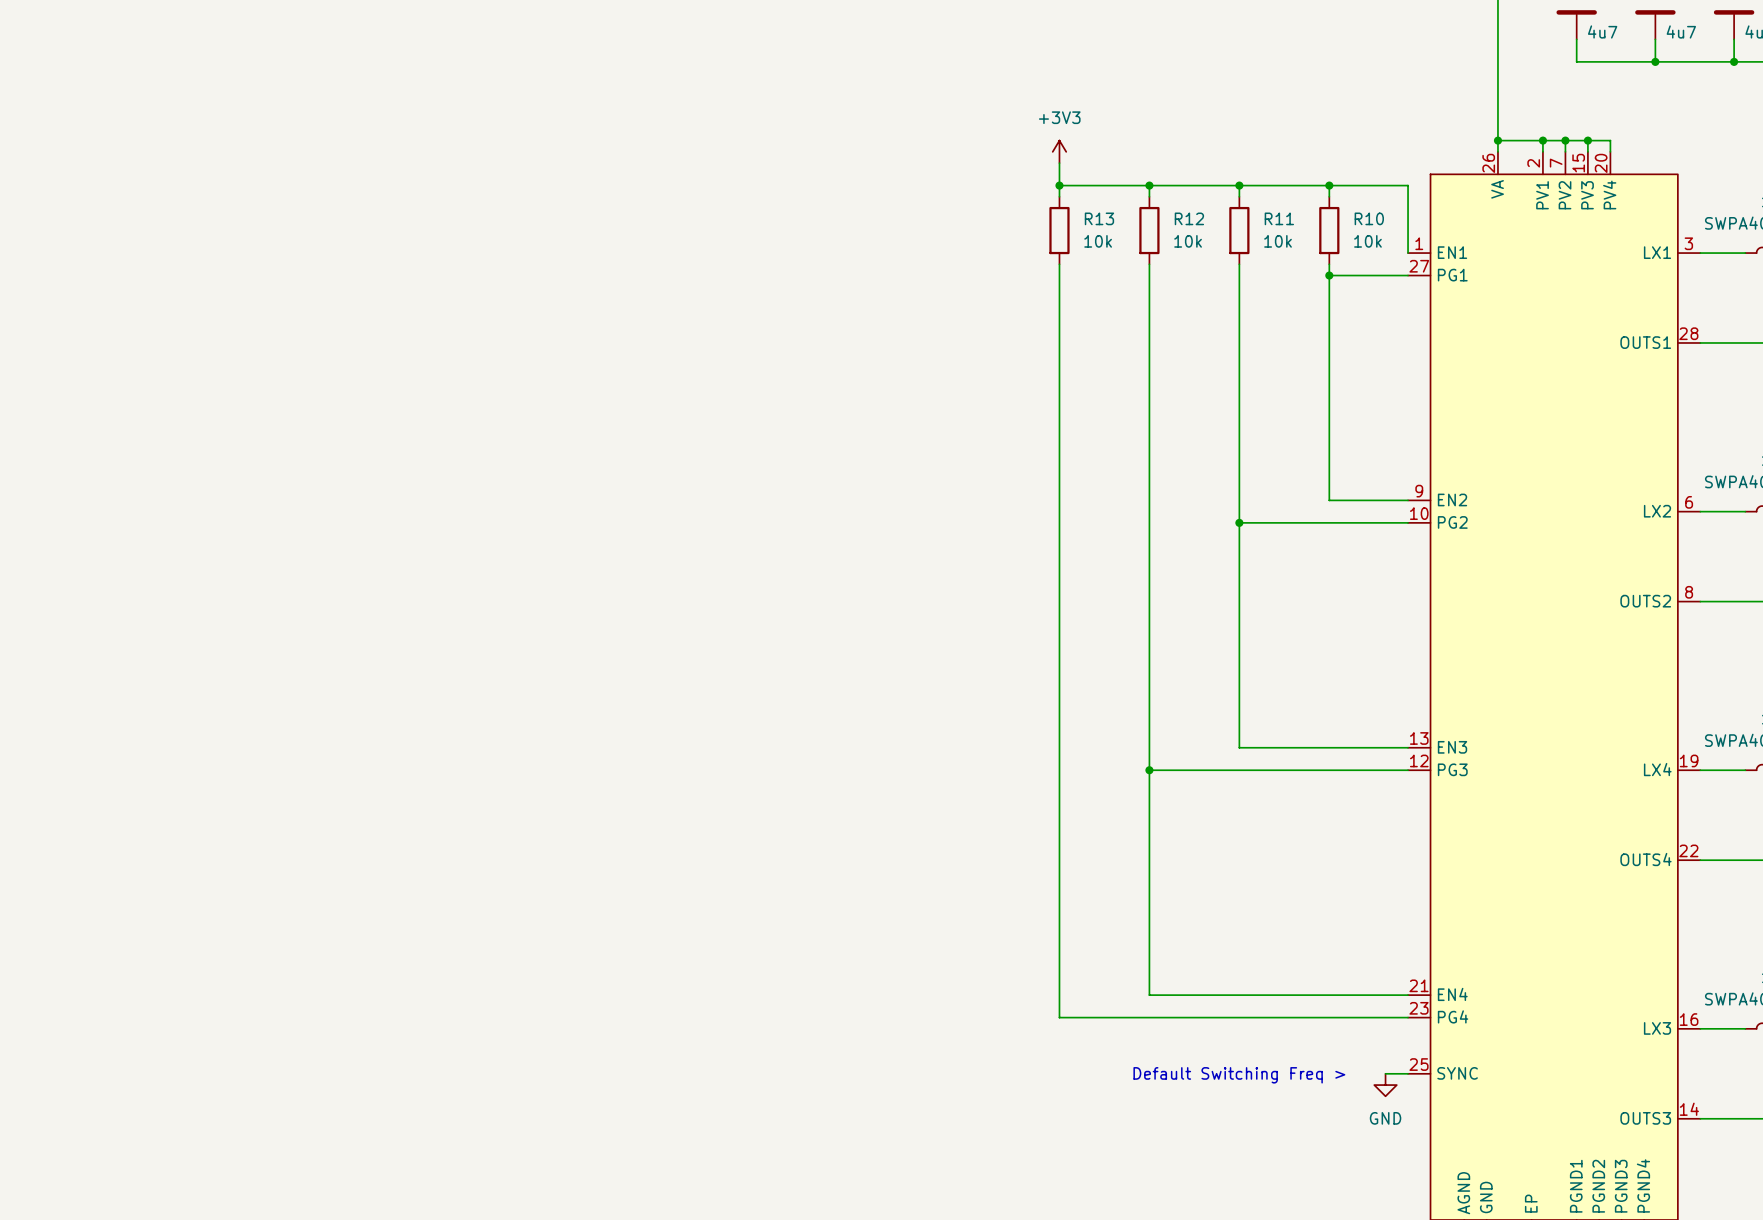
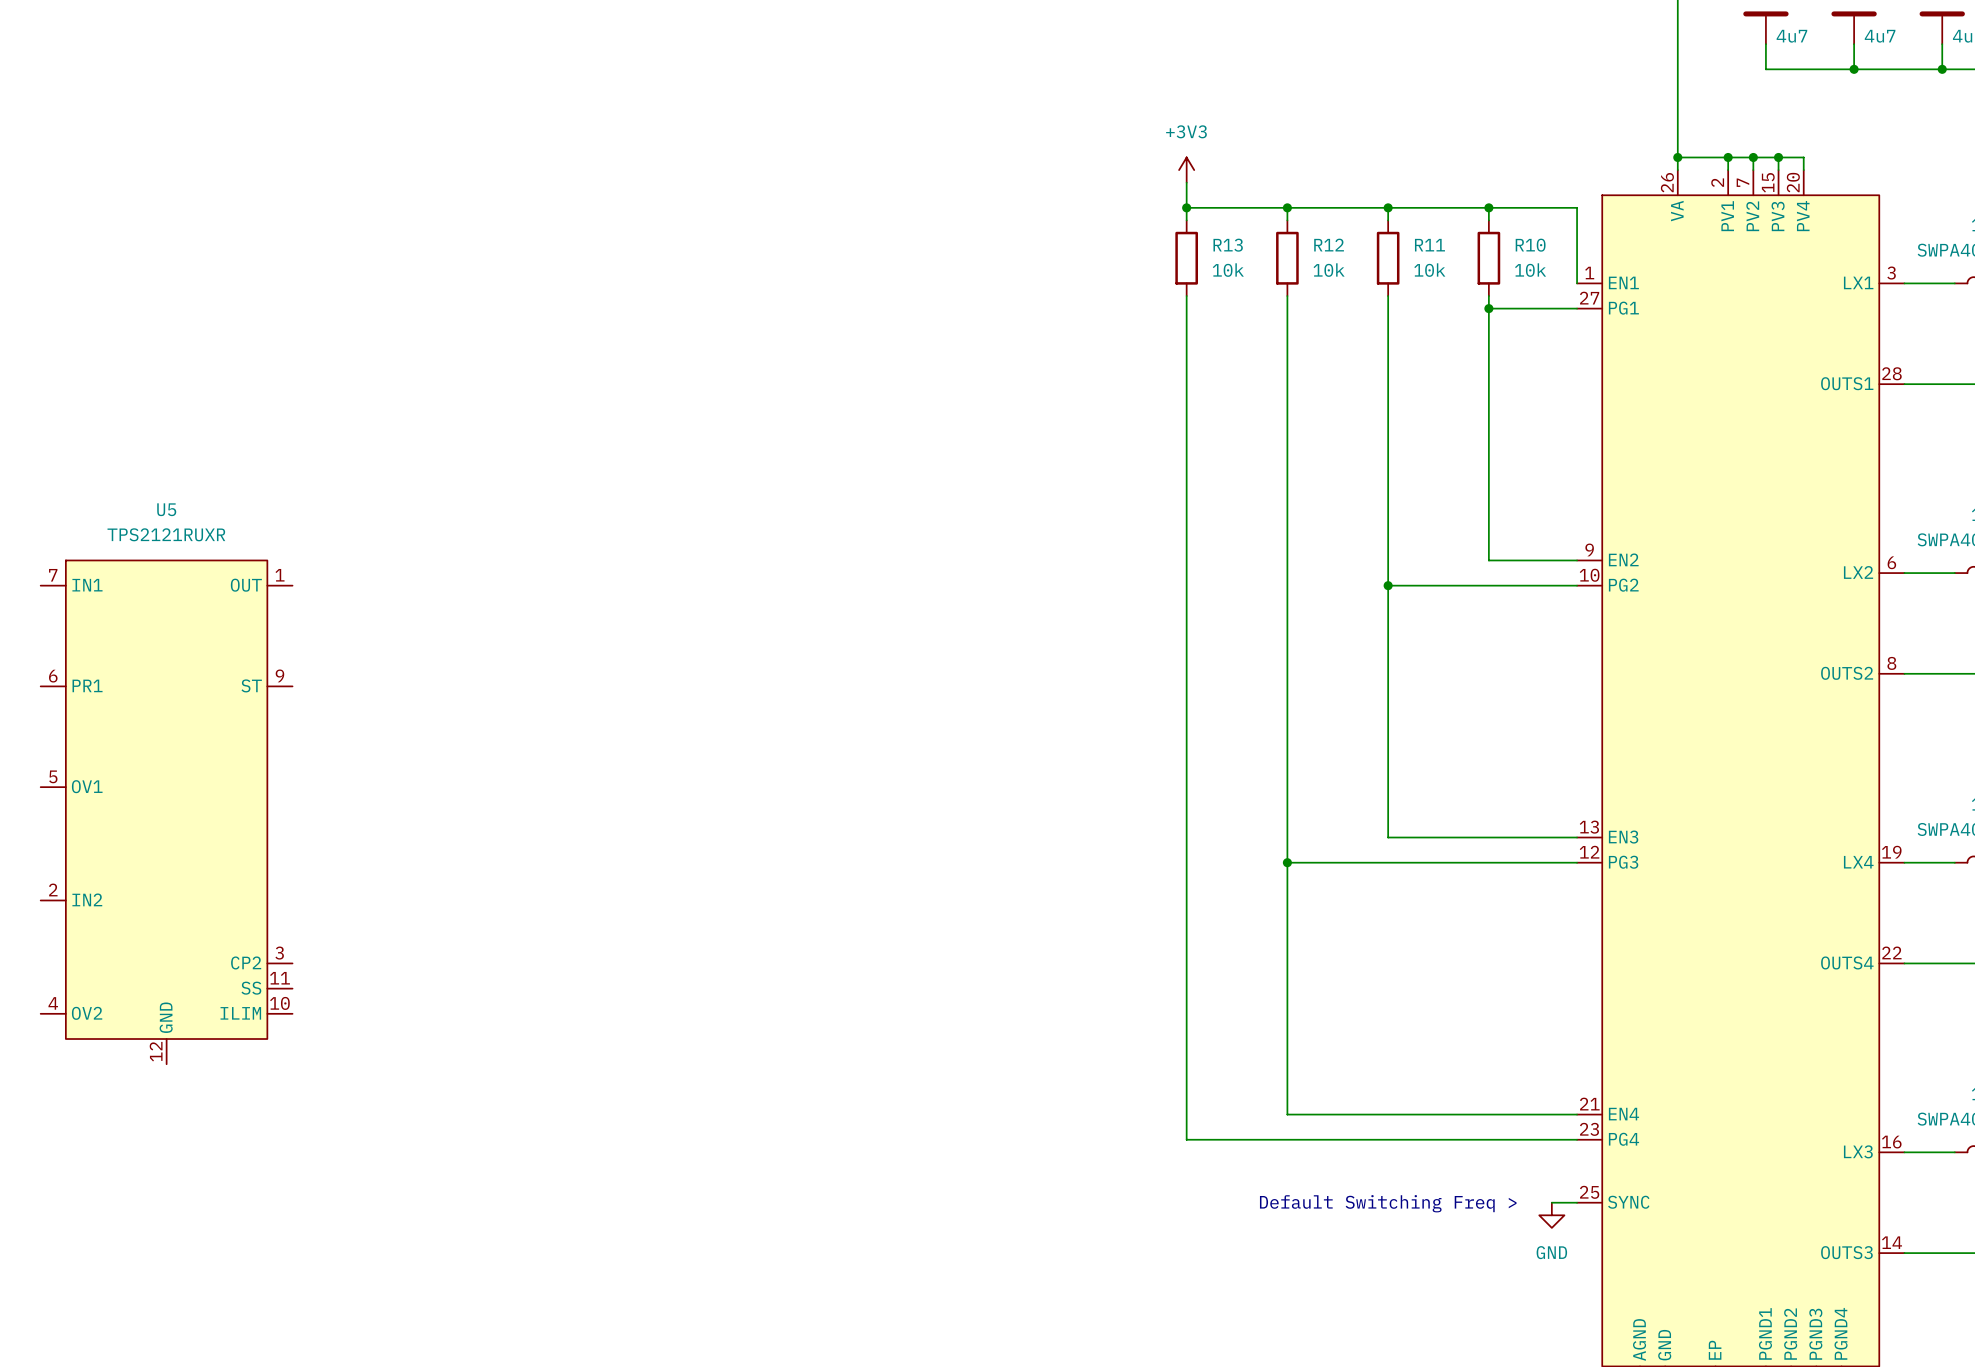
U5: none -> TPS2121RUXR (166, 812)

